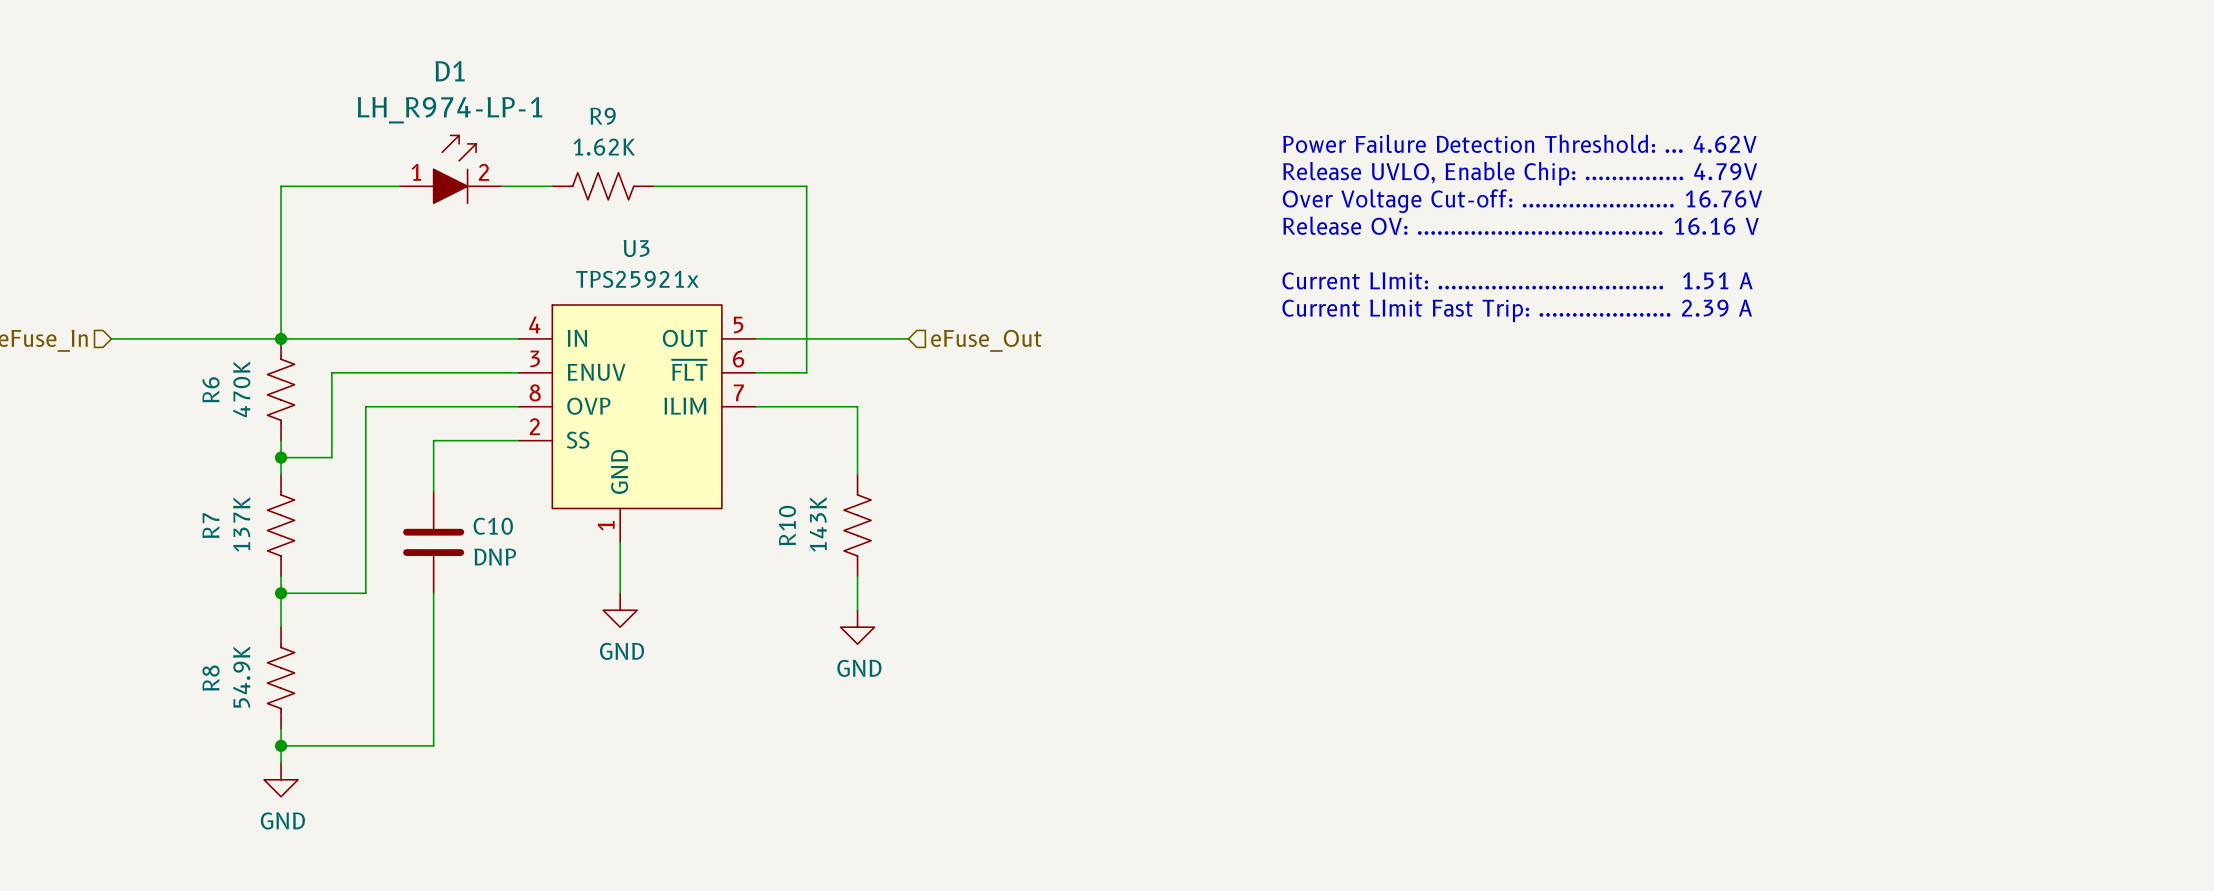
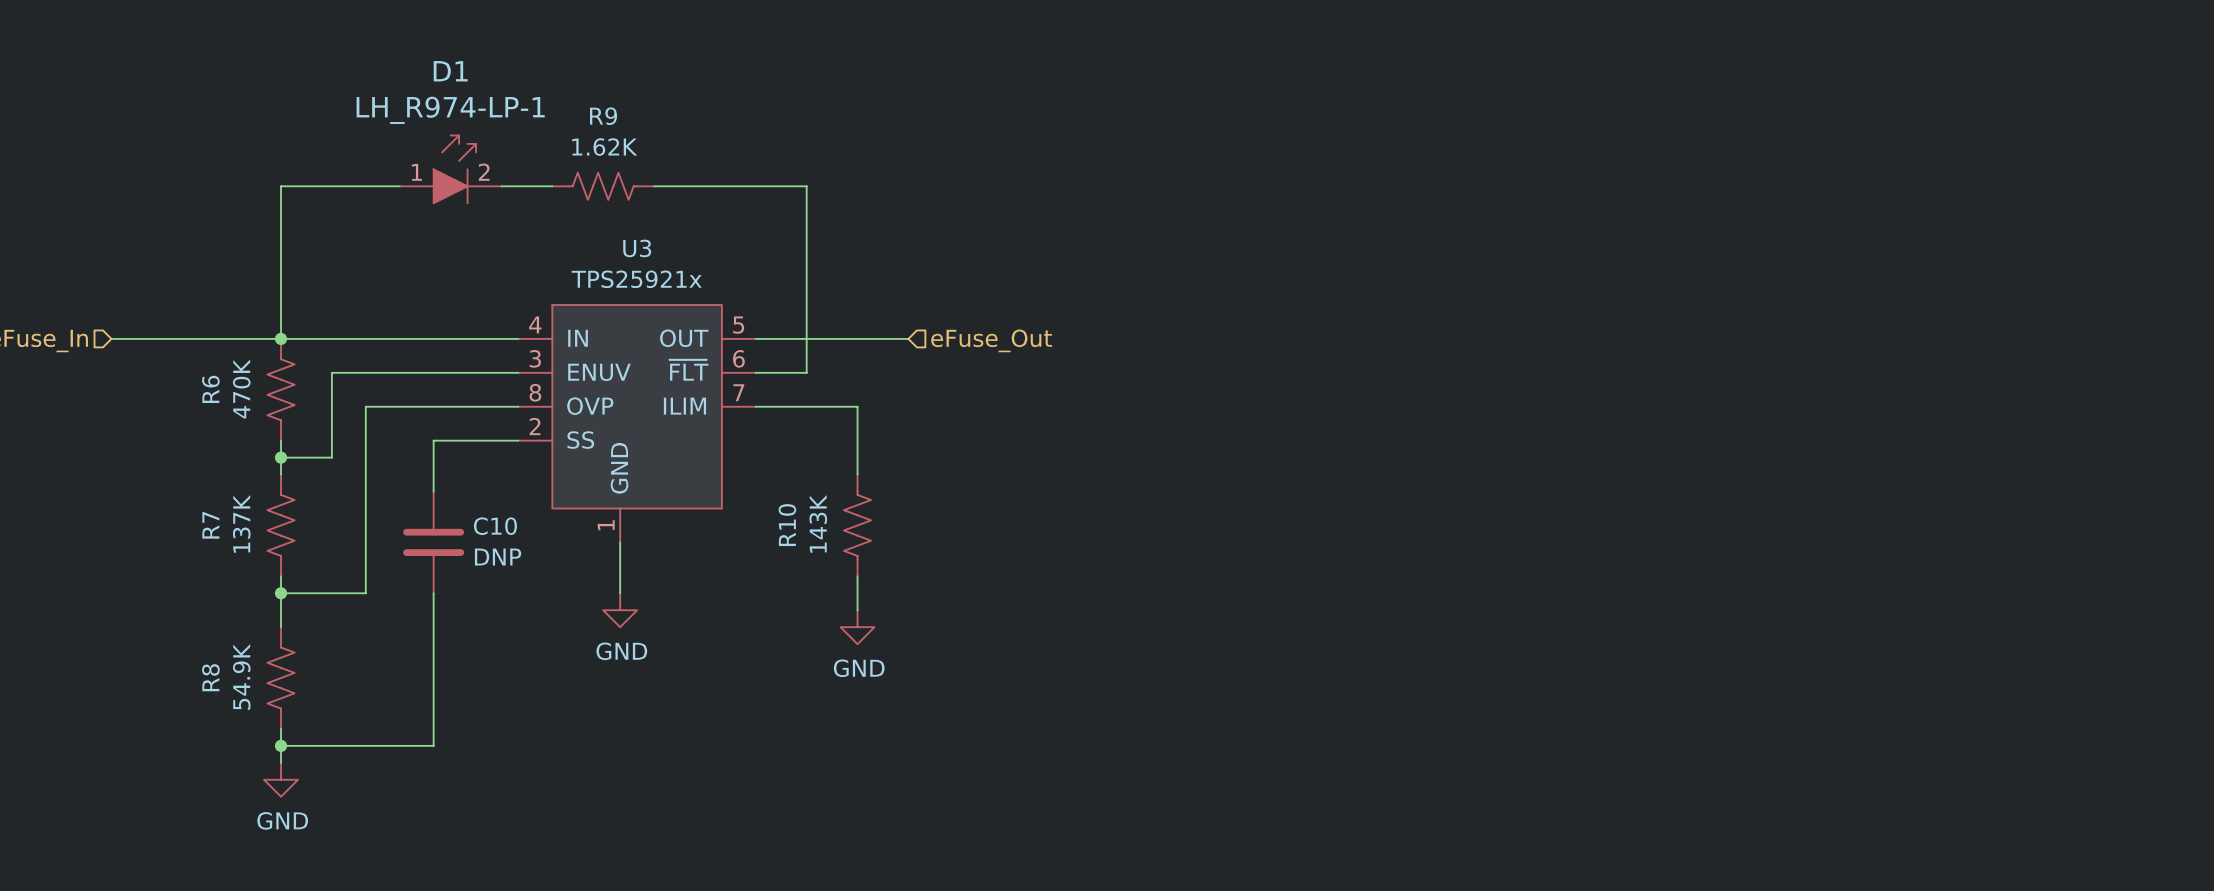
text: Power Failure Detection Threshold: ... 4.62V (1519, 143) -> none
text: Release UVLO, Enable Chip: ............... 4.79V (1520, 173) -> none
text: Over Voltage Cut-off: ....................... 16.76V (1522, 201) -> none
text: Release OV: ..................................... 16.16 V (1520, 225) -> none
text: Current LImit: .................................. 1.51 A (1517, 280) -> none
text: Current LImit Fast Trip: .................... 2.39 A (1517, 310) -> none

